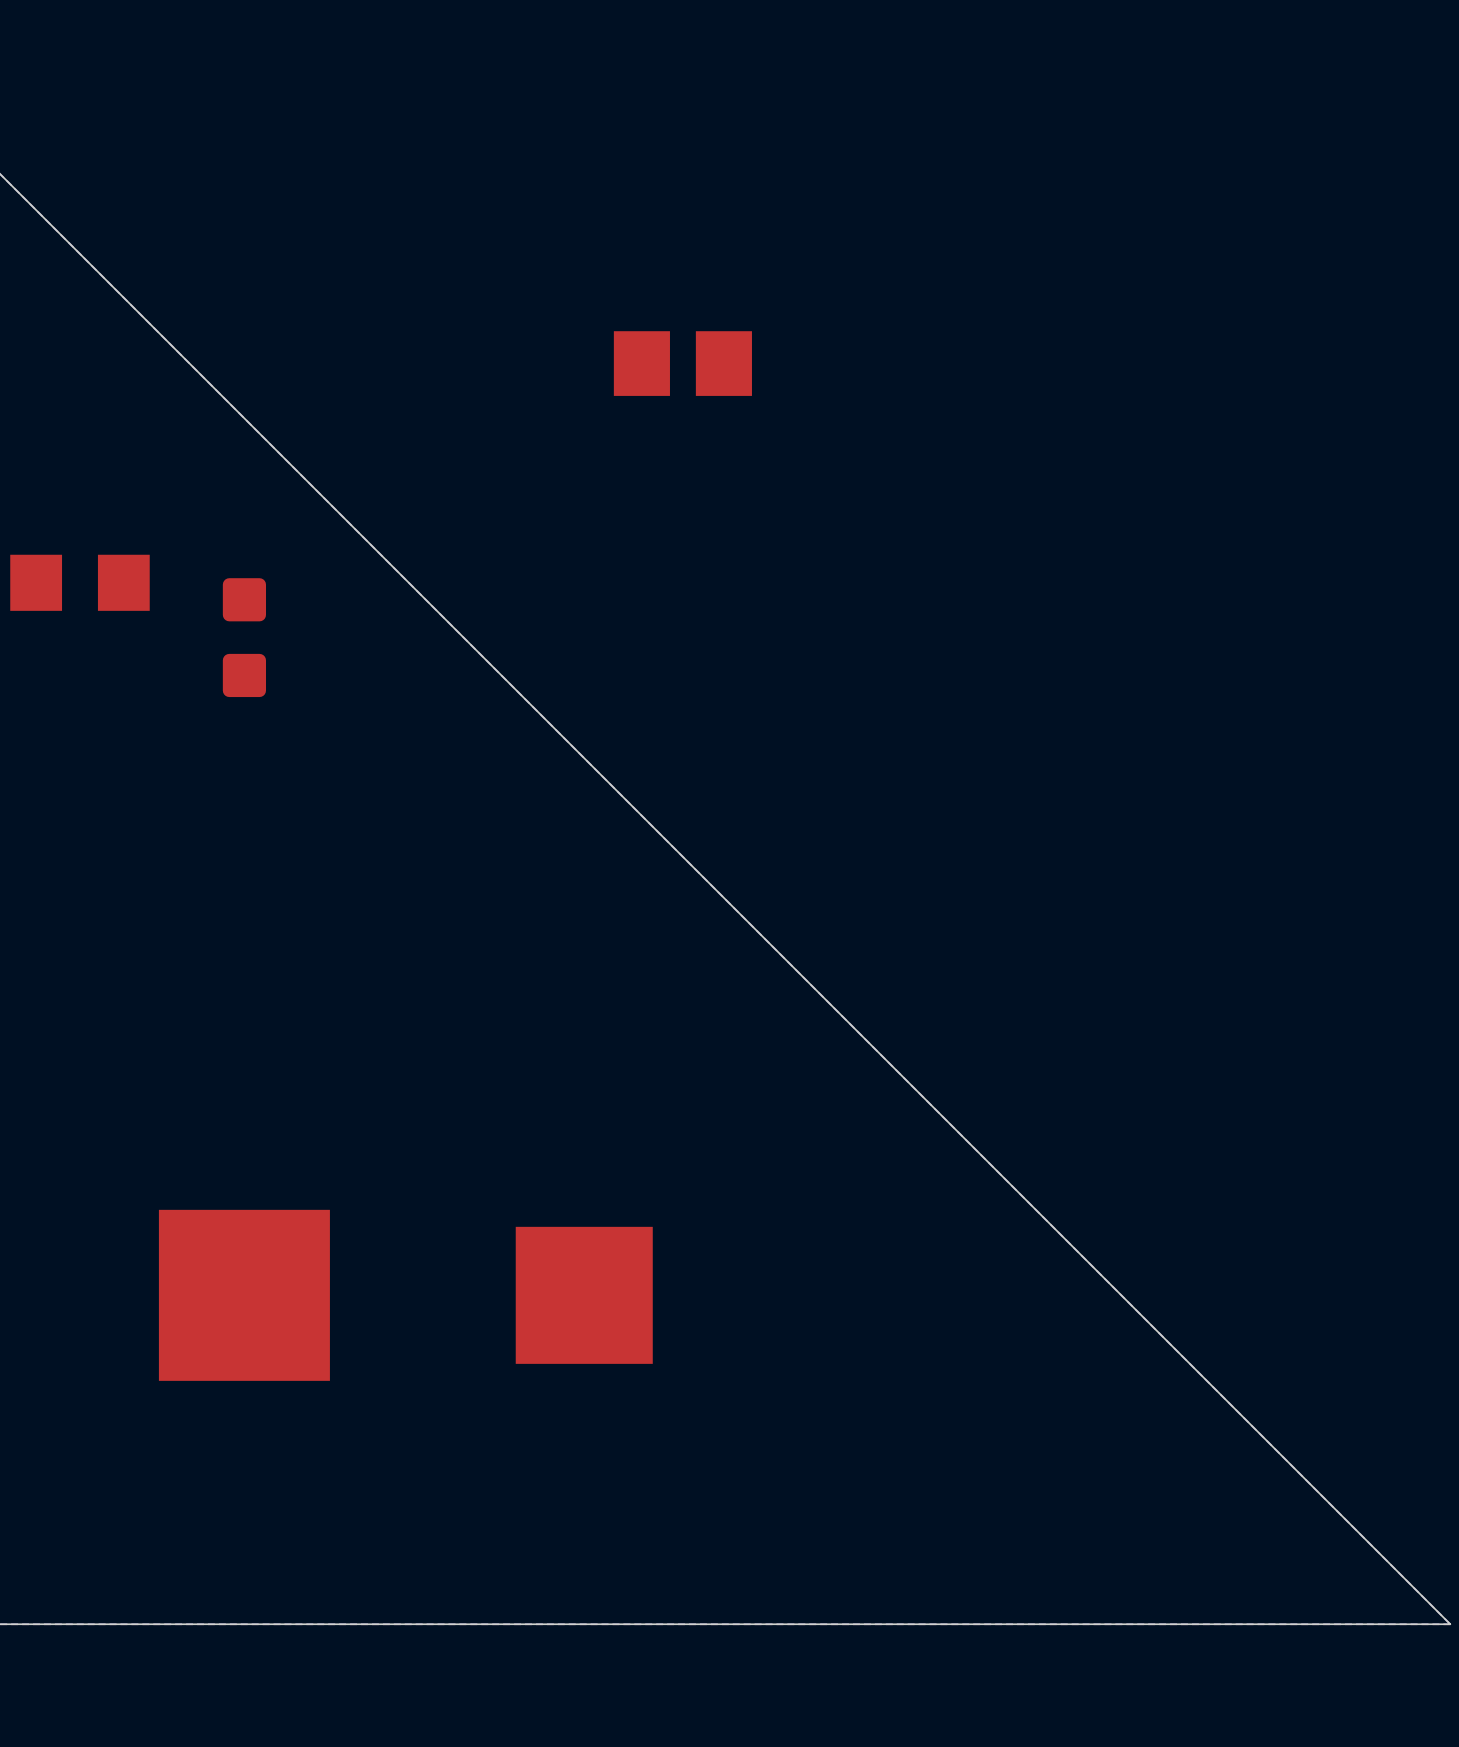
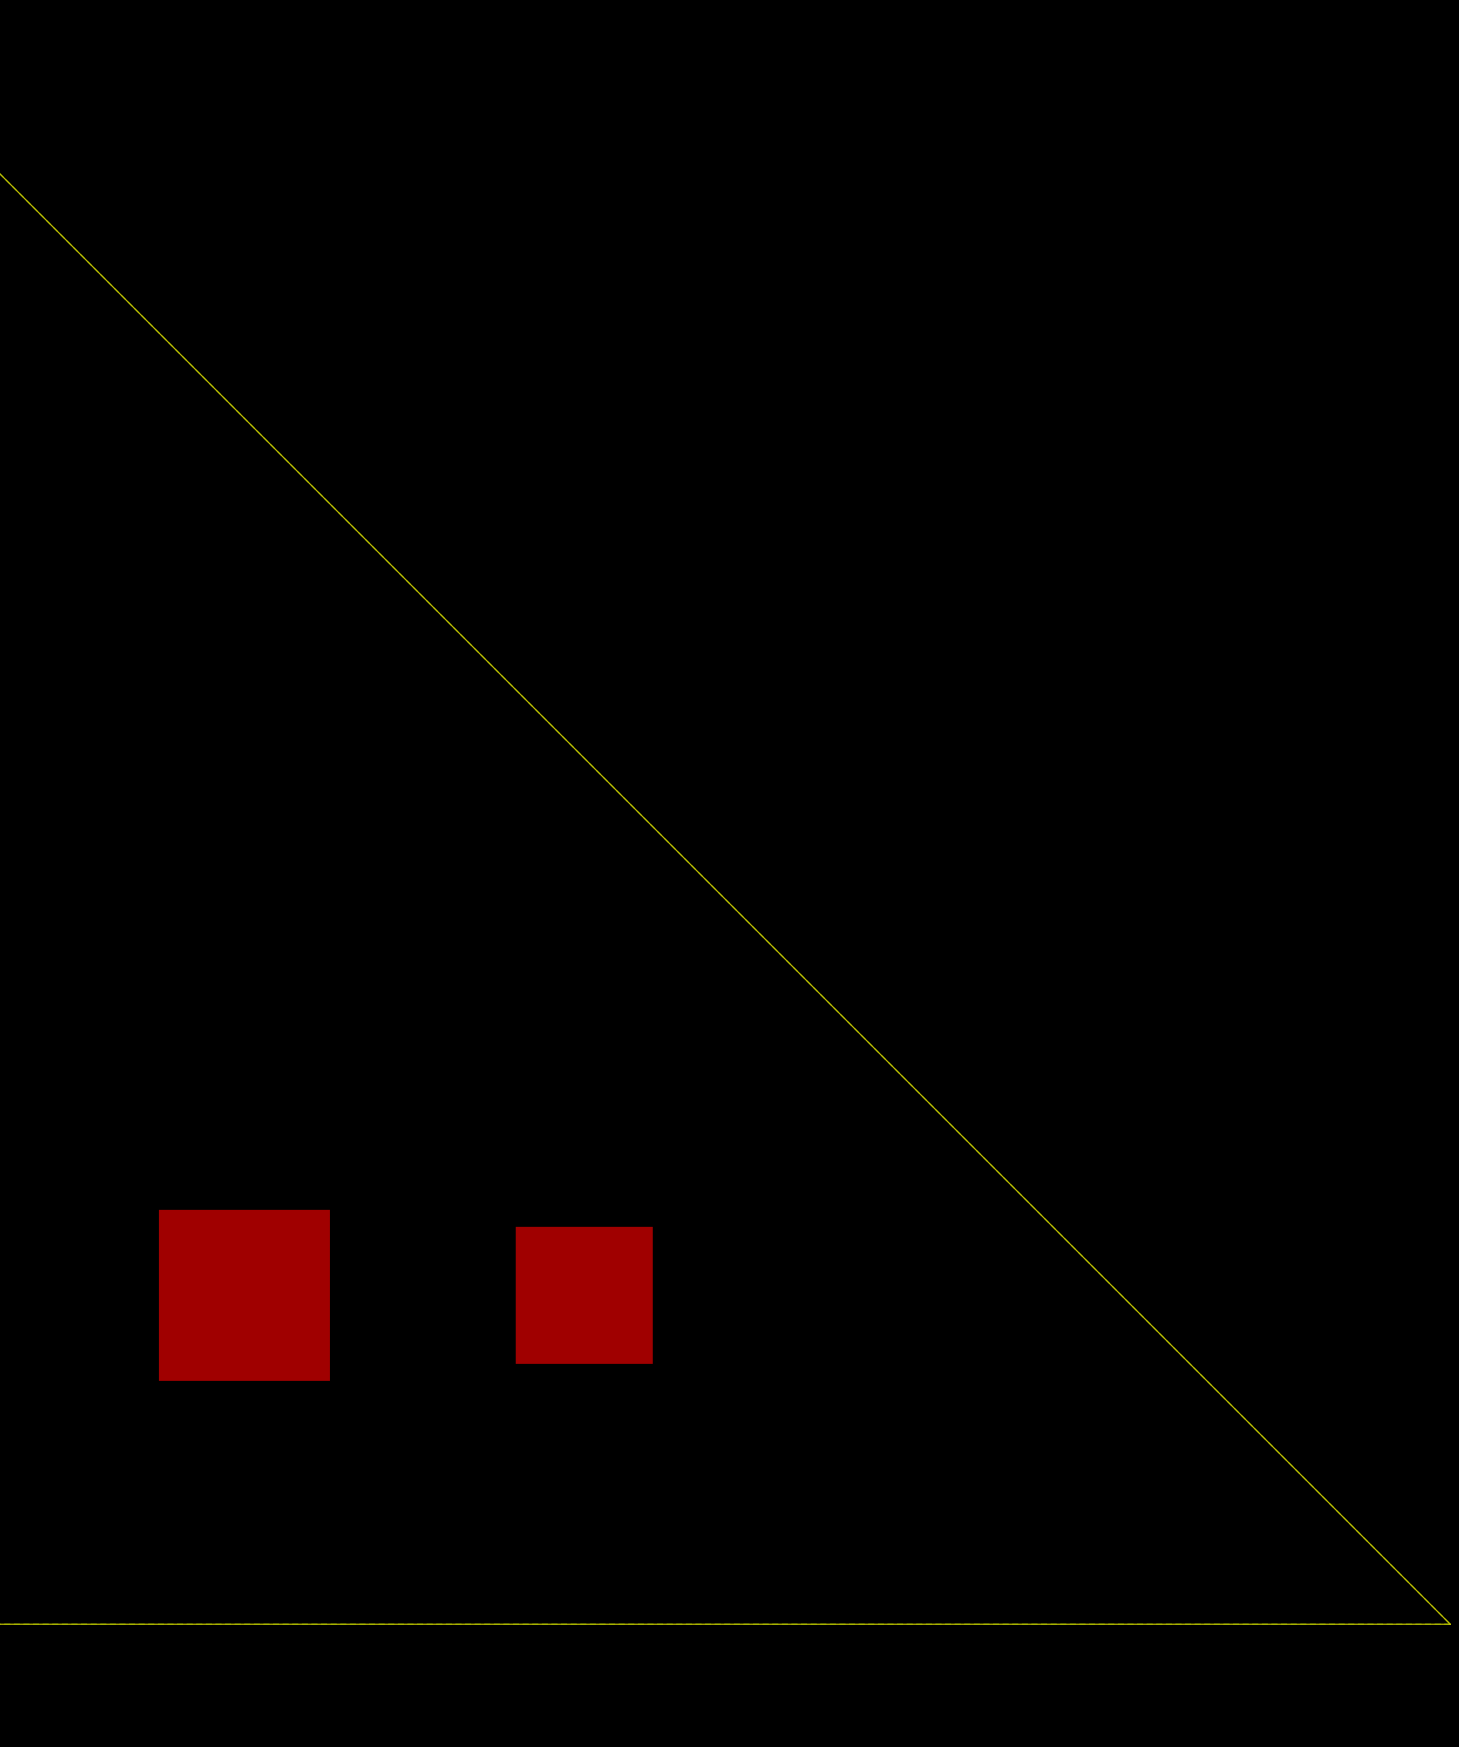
part: (682, 363) -> none
part: (79, 582) -> none
part: (244, 637) -> none

